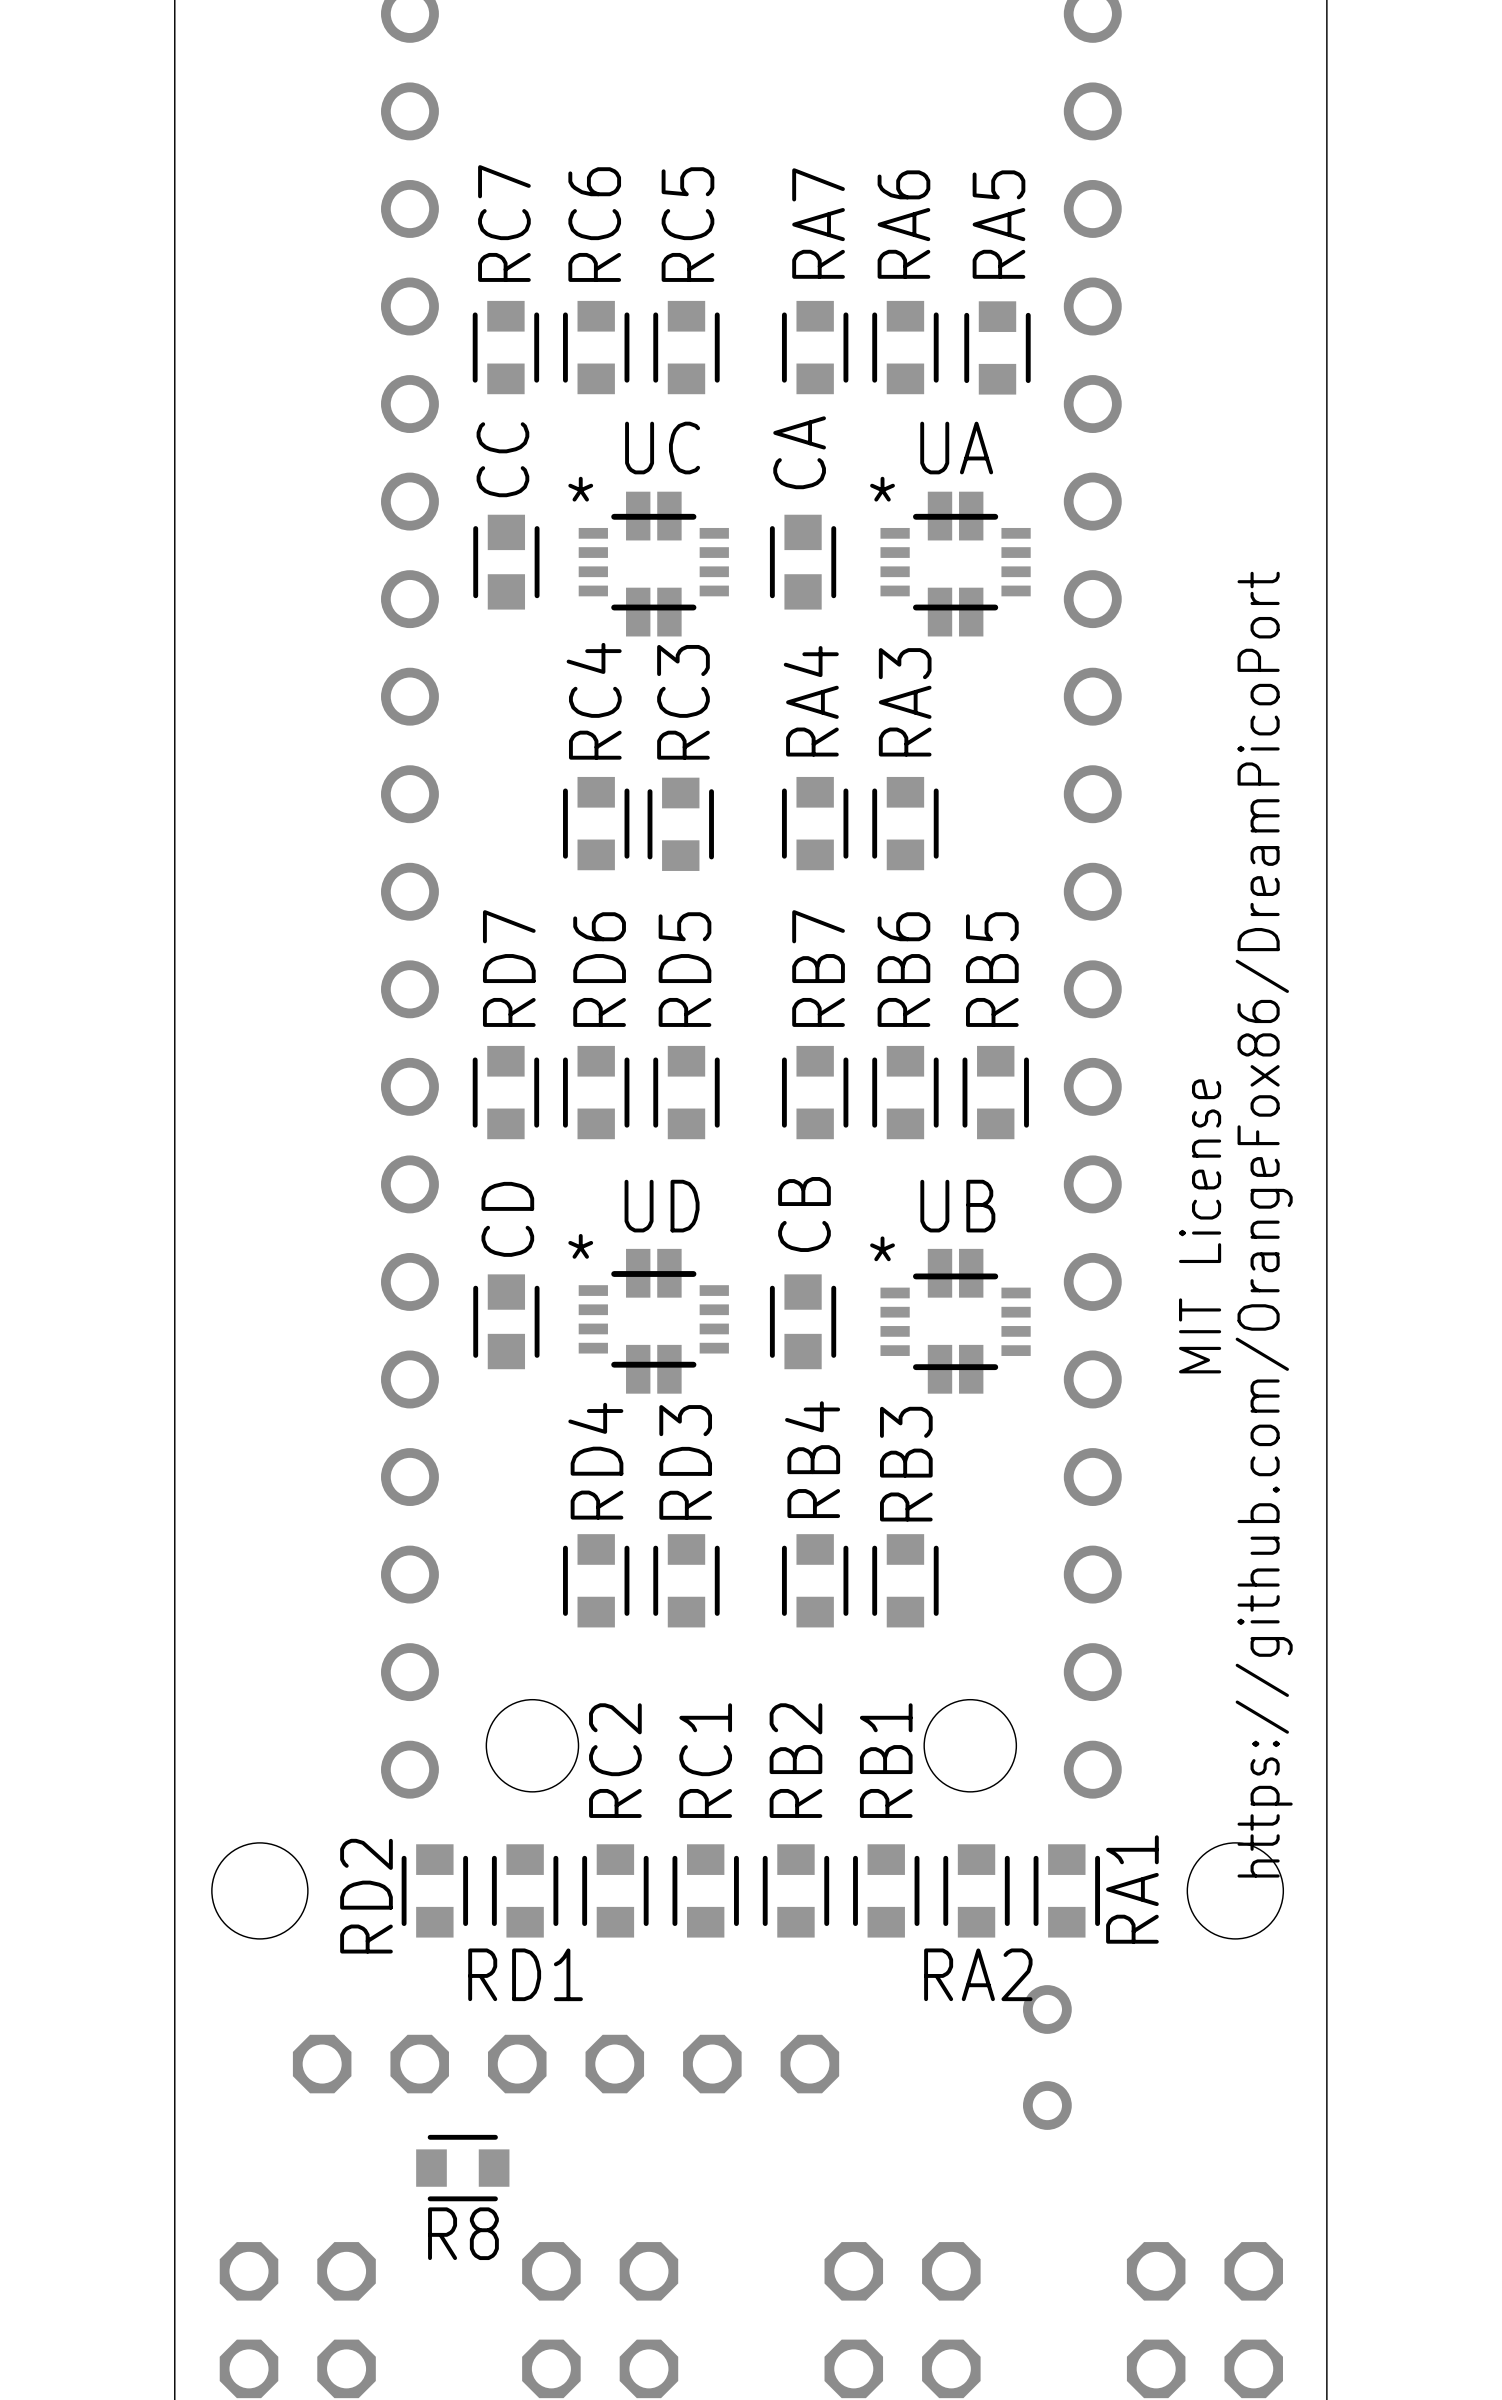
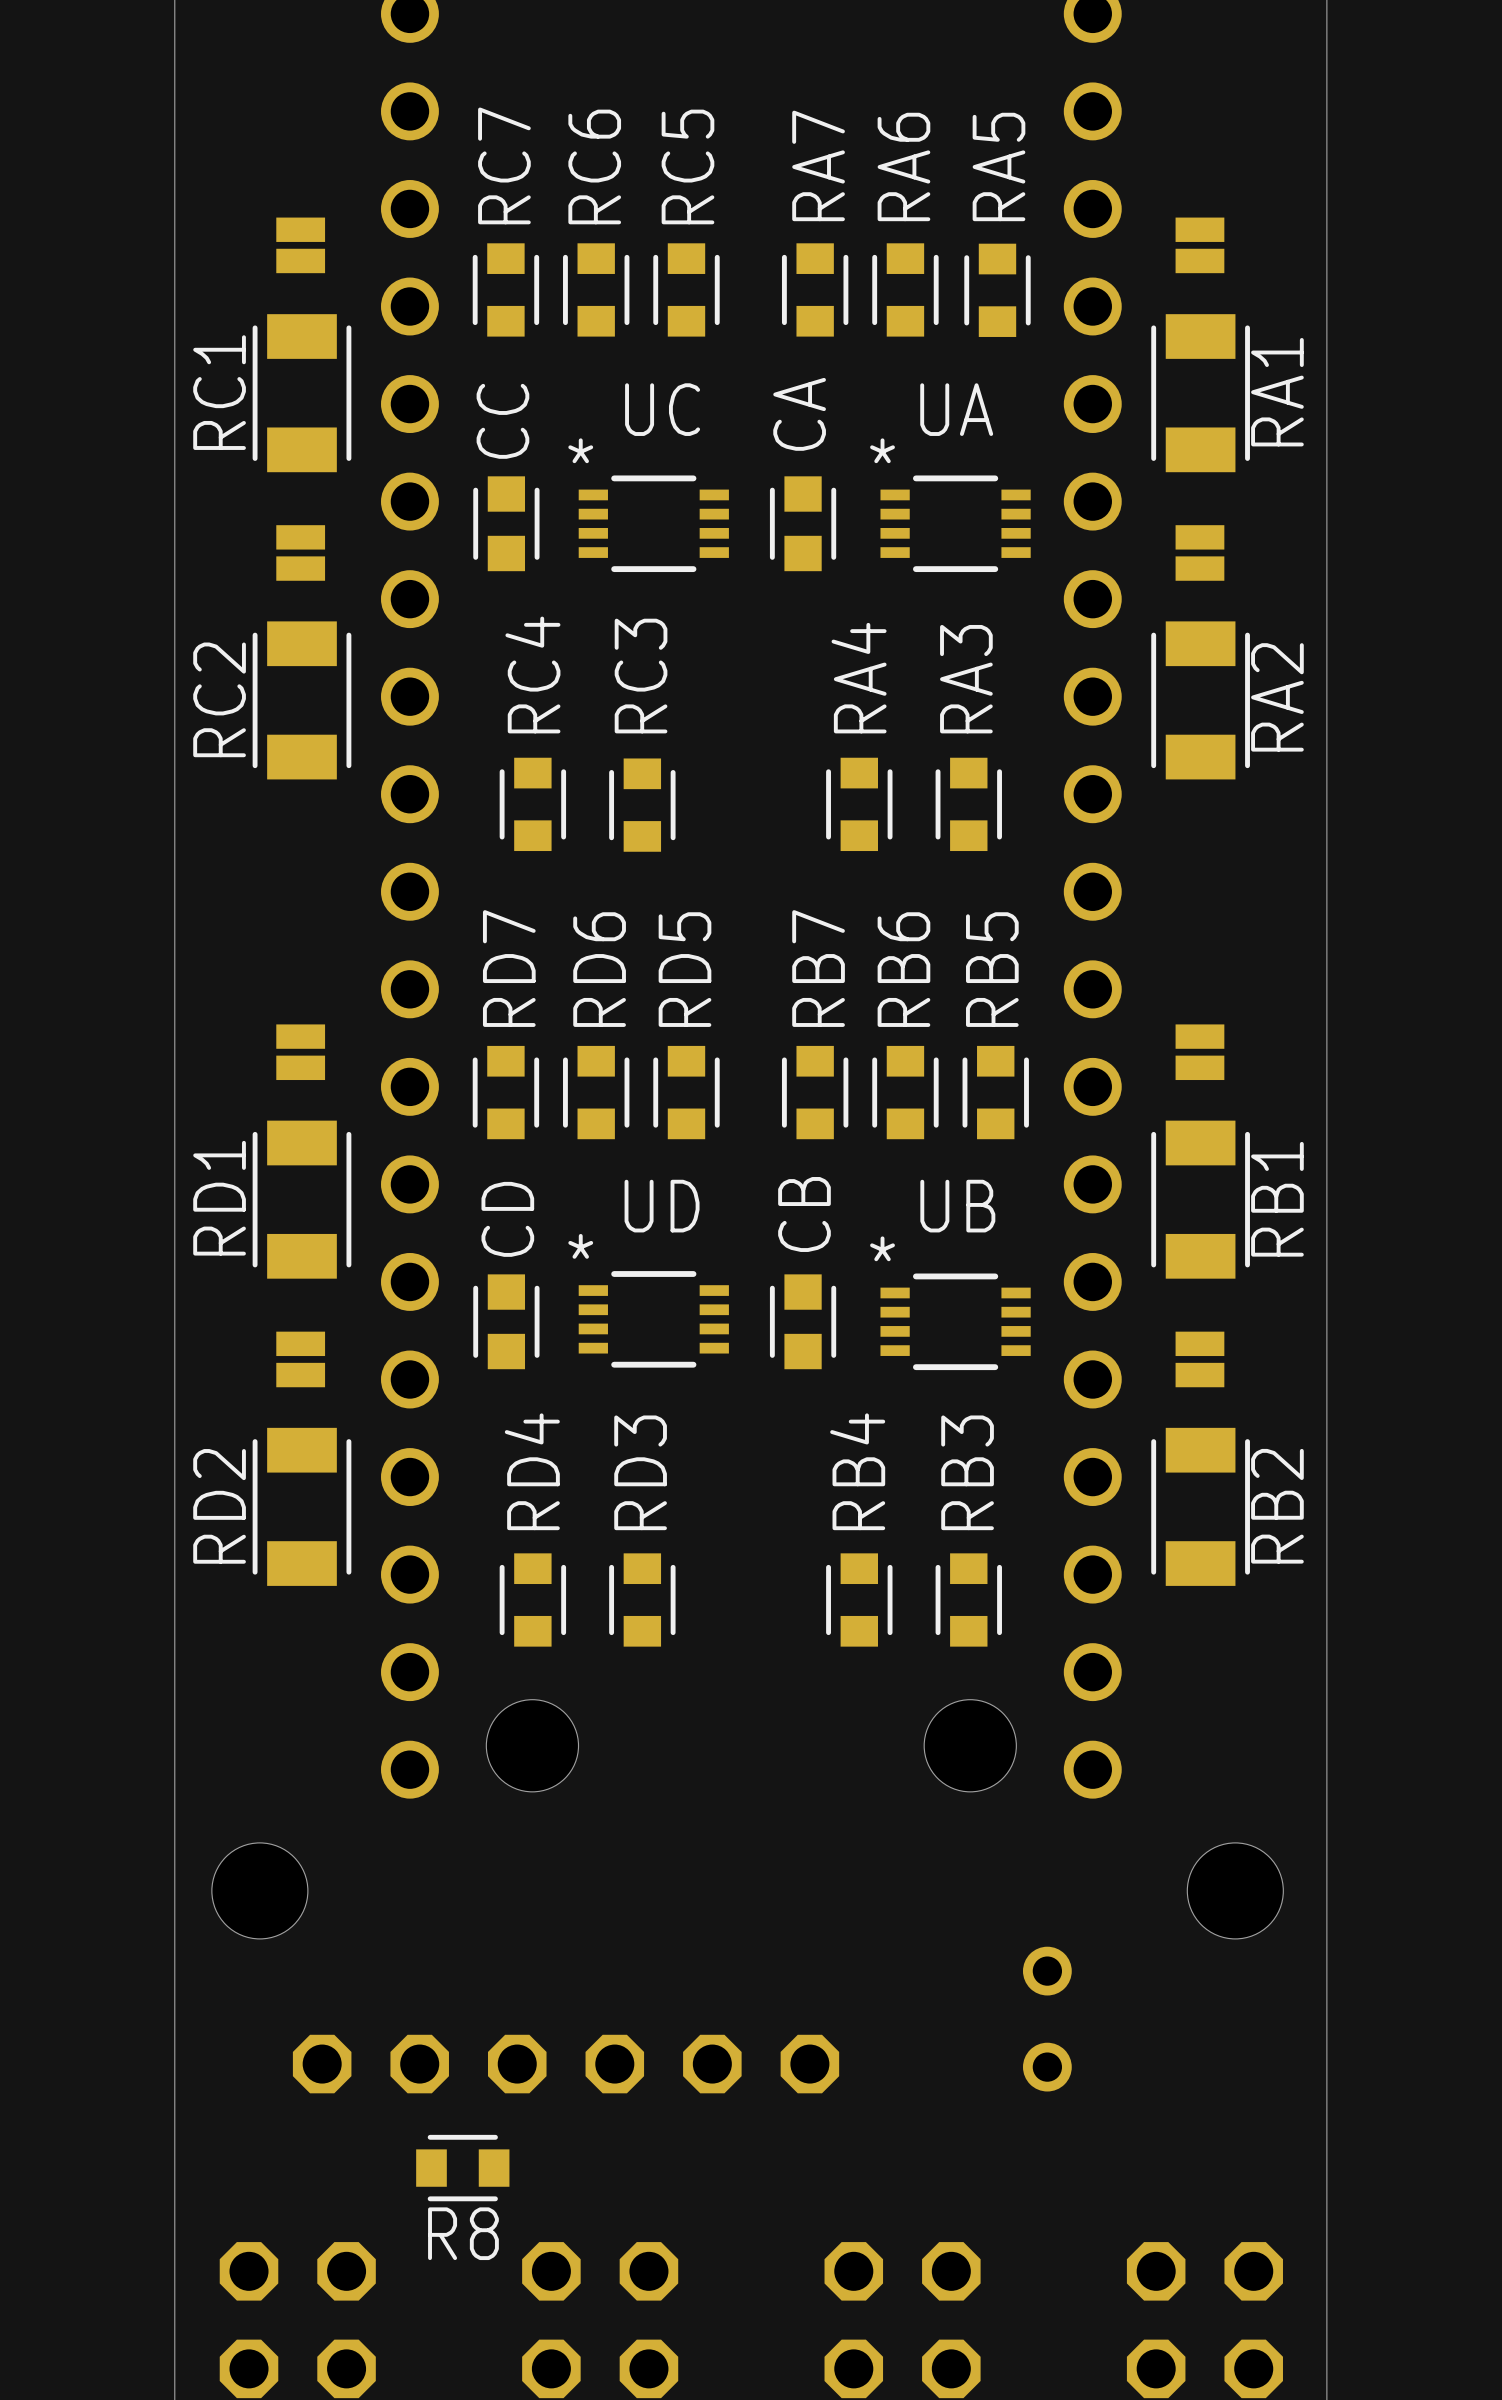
part: none -> (300, 245)
part: none -> (1199, 245)
RC7 position: (505, 347) -> (505, 289)
RC6 position: (596, 347) -> (596, 289)
RC5 position: (686, 347) -> (686, 289)
RA7 position: (815, 347) -> (815, 289)
RA6 position: (905, 347) -> (905, 289)
RA5 position: (997, 347) -> (997, 290)
part: (653, 516) -> none
part: (955, 516) -> none
part: none -> (300, 552)
part: none -> (1199, 552)
CC position: (506, 562) -> (506, 523)
UC position: (653, 562) -> (653, 523)
CA position: (803, 562) -> (803, 523)
UA position: (955, 562) -> (955, 523)
part: (653, 612) -> none
part: (955, 612) -> none
RC4 name position: RC4 (594, 701) -> RC4 (532, 675)
RA4 name position: RA4 (811, 701) -> RA4 (859, 678)
RC3 name position: RC3 (683, 702) -> RC3 (641, 676)
RA3 name position: RA3 (905, 702) -> RA3 (966, 679)
RC4 position: (596, 823) -> (532, 804)
RA4 position: (815, 823) -> (859, 804)
RA3 position: (905, 823) -> (968, 804)
RC3 position: (680, 824) -> (642, 805)
part: none -> (300, 1052)
part: none -> (1199, 1052)
text: https://github.com/OrangeFox86/DreamPicoPort (1264, 1224) -> none
text: MIT License (1200, 1226) -> none
part: (653, 1273) -> none
part: (955, 1273) -> none
part: none -> (300, 1359)
part: none -> (1199, 1359)
part: (653, 1369) -> none
part: (955, 1369) -> none
RB4 name position: RB4 (812, 1459) -> RB4 (857, 1471)
RD4 name position: RD4 (595, 1461) -> RD4 (532, 1471)
RD3 name position: RD3 (685, 1462) -> RD3 (640, 1472)
RB3 name position: RB3 (906, 1464) -> RB3 (967, 1472)
RD4 position: (596, 1580) -> (532, 1599)
RD3 position: (686, 1580) -> (642, 1599)
RB4 position: (815, 1580) -> (859, 1599)
RB3 position: (905, 1580) -> (968, 1599)
RC2 name position: RC2 (615, 1760) -> RC2 (219, 699)
RC1 name position: RC1 (705, 1760) -> RC1 (219, 392)
RB2 name position: RB2 (795, 1760) -> RB2 (1277, 1506)
RB1 name position: RB1 (886, 1760) -> RB1 (1277, 1199)
RD2 footprint: [401, 1844, 469, 1938] -> [252, 1427, 352, 1586]
RD1 footprint: [491, 1844, 559, 1938] -> [252, 1120, 352, 1279]
RC2 footprint: [582, 1844, 649, 1938] -> [252, 621, 352, 780]
RC1 footprint: [672, 1844, 739, 1938] -> [252, 314, 352, 473]
RB2 footprint: [762, 1844, 830, 1938] -> [1151, 1427, 1250, 1586]
RB1 footprint: [853, 1844, 920, 1938] -> [1151, 1120, 1250, 1279]
RA2 footprint: [943, 1844, 1010, 1938] -> [1151, 621, 1250, 780]
RA1 footprint: [1033, 1844, 1101, 1938] -> [1151, 314, 1250, 473]
RD1 name position: RD1 (525, 1974) -> RD1 (219, 1198)
RA2 name position: RA2 (978, 1974) -> RA2 (1277, 697)
part position: (1047, 2057) -> (1047, 2019)

